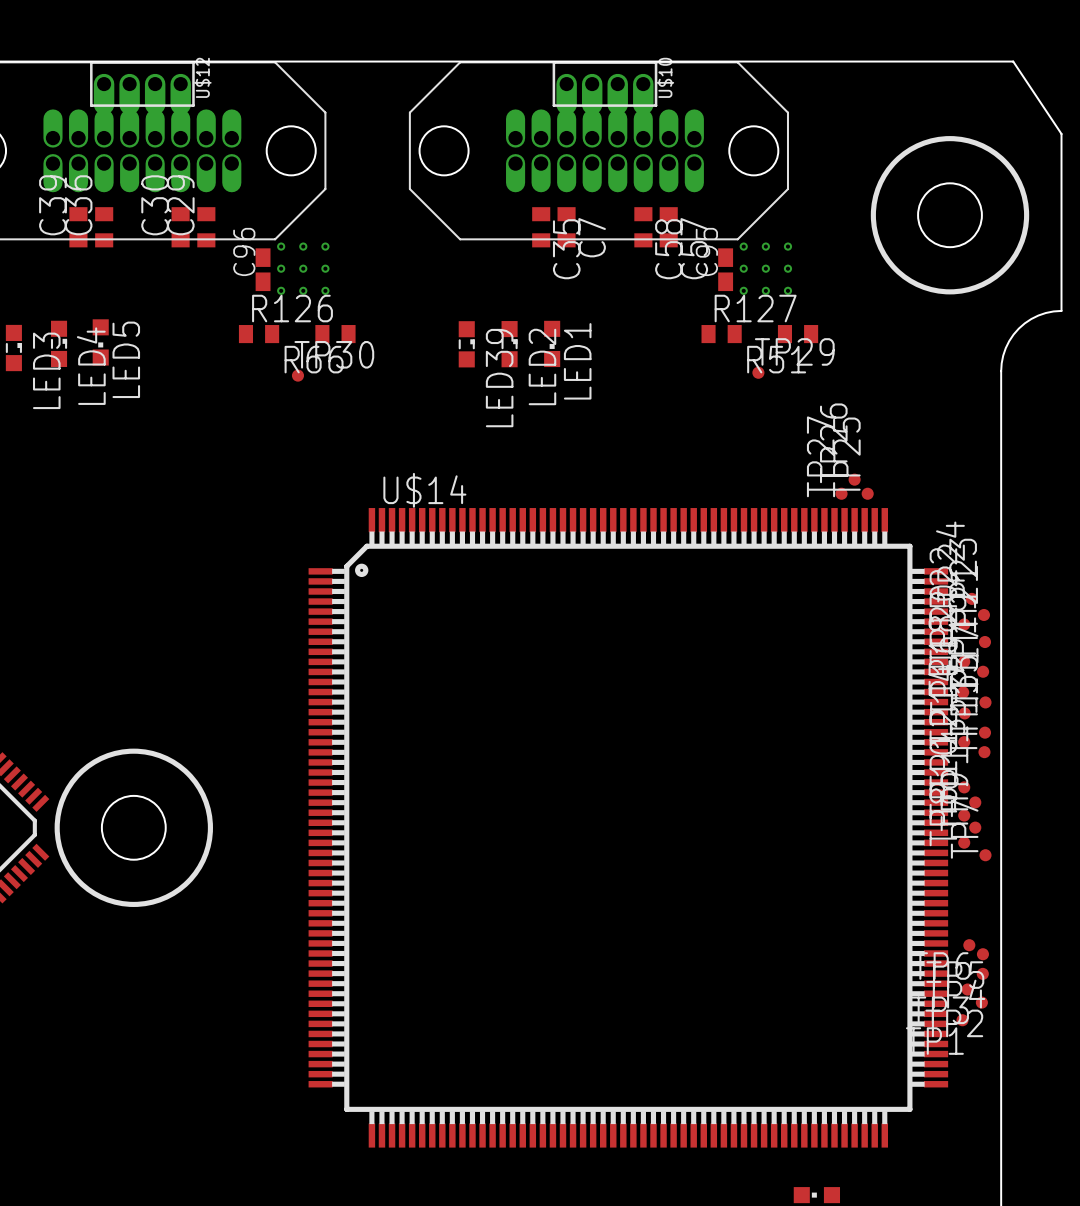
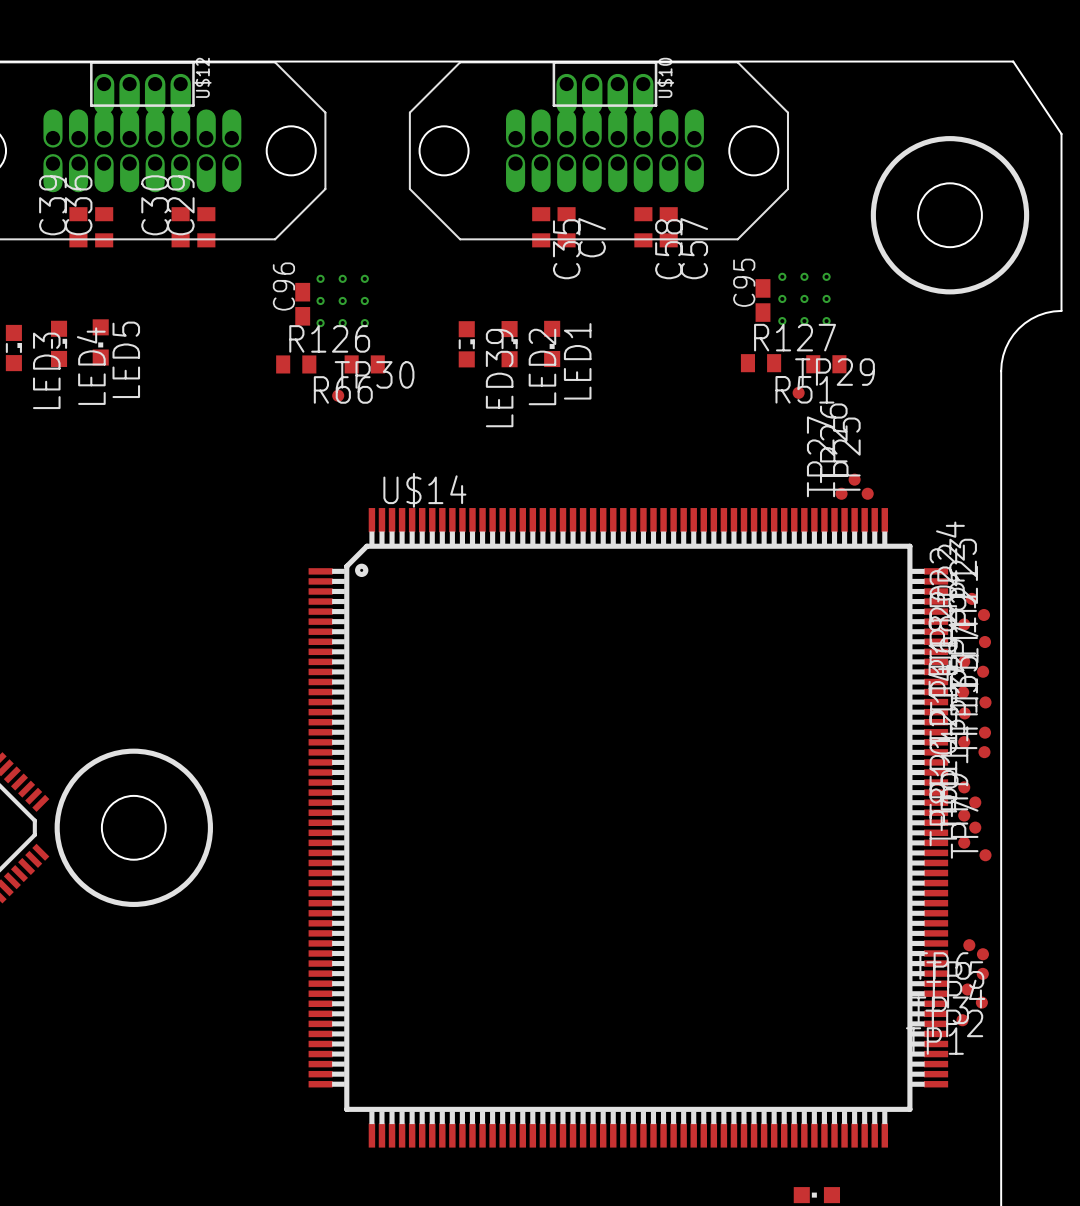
part position: (303, 268) -> (342, 300)
part position: (765, 268) -> (804, 298)
C96 position: (263, 269) -> (302, 304)
C95 position: (725, 269) -> (763, 300)
R126 position: (259, 334) -> (296, 364)
R66 position: (335, 334) -> (364, 364)
R127 position: (721, 334) -> (761, 363)
R51 position: (798, 334) -> (826, 364)
TP29 position: (758, 372) -> (798, 392)
TP30 position: (297, 375) -> (338, 395)

